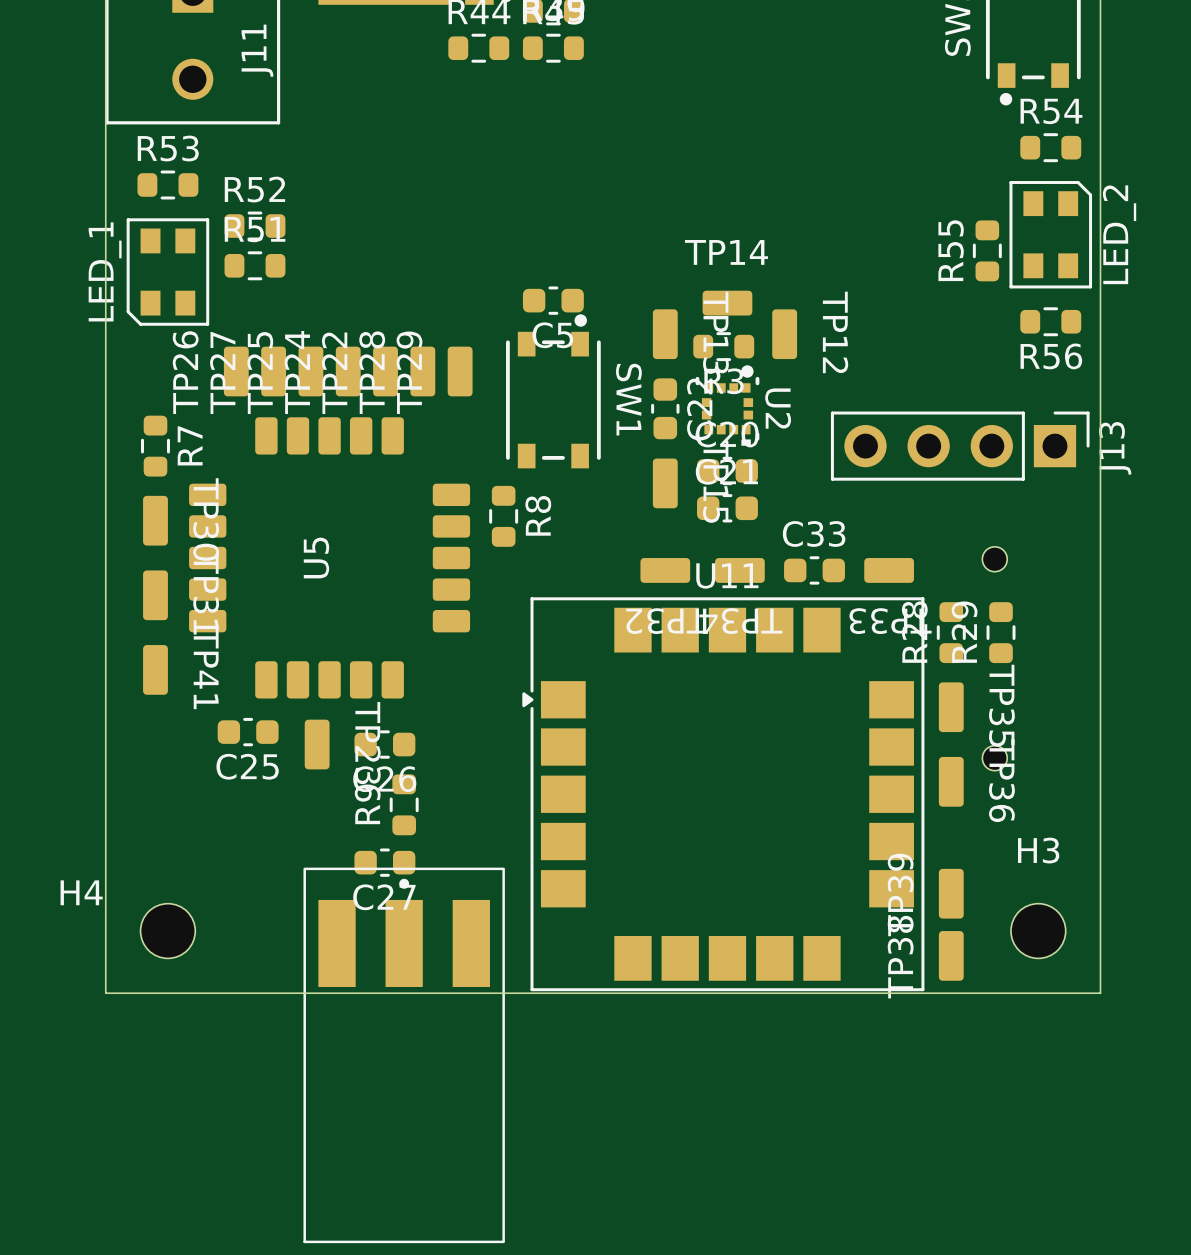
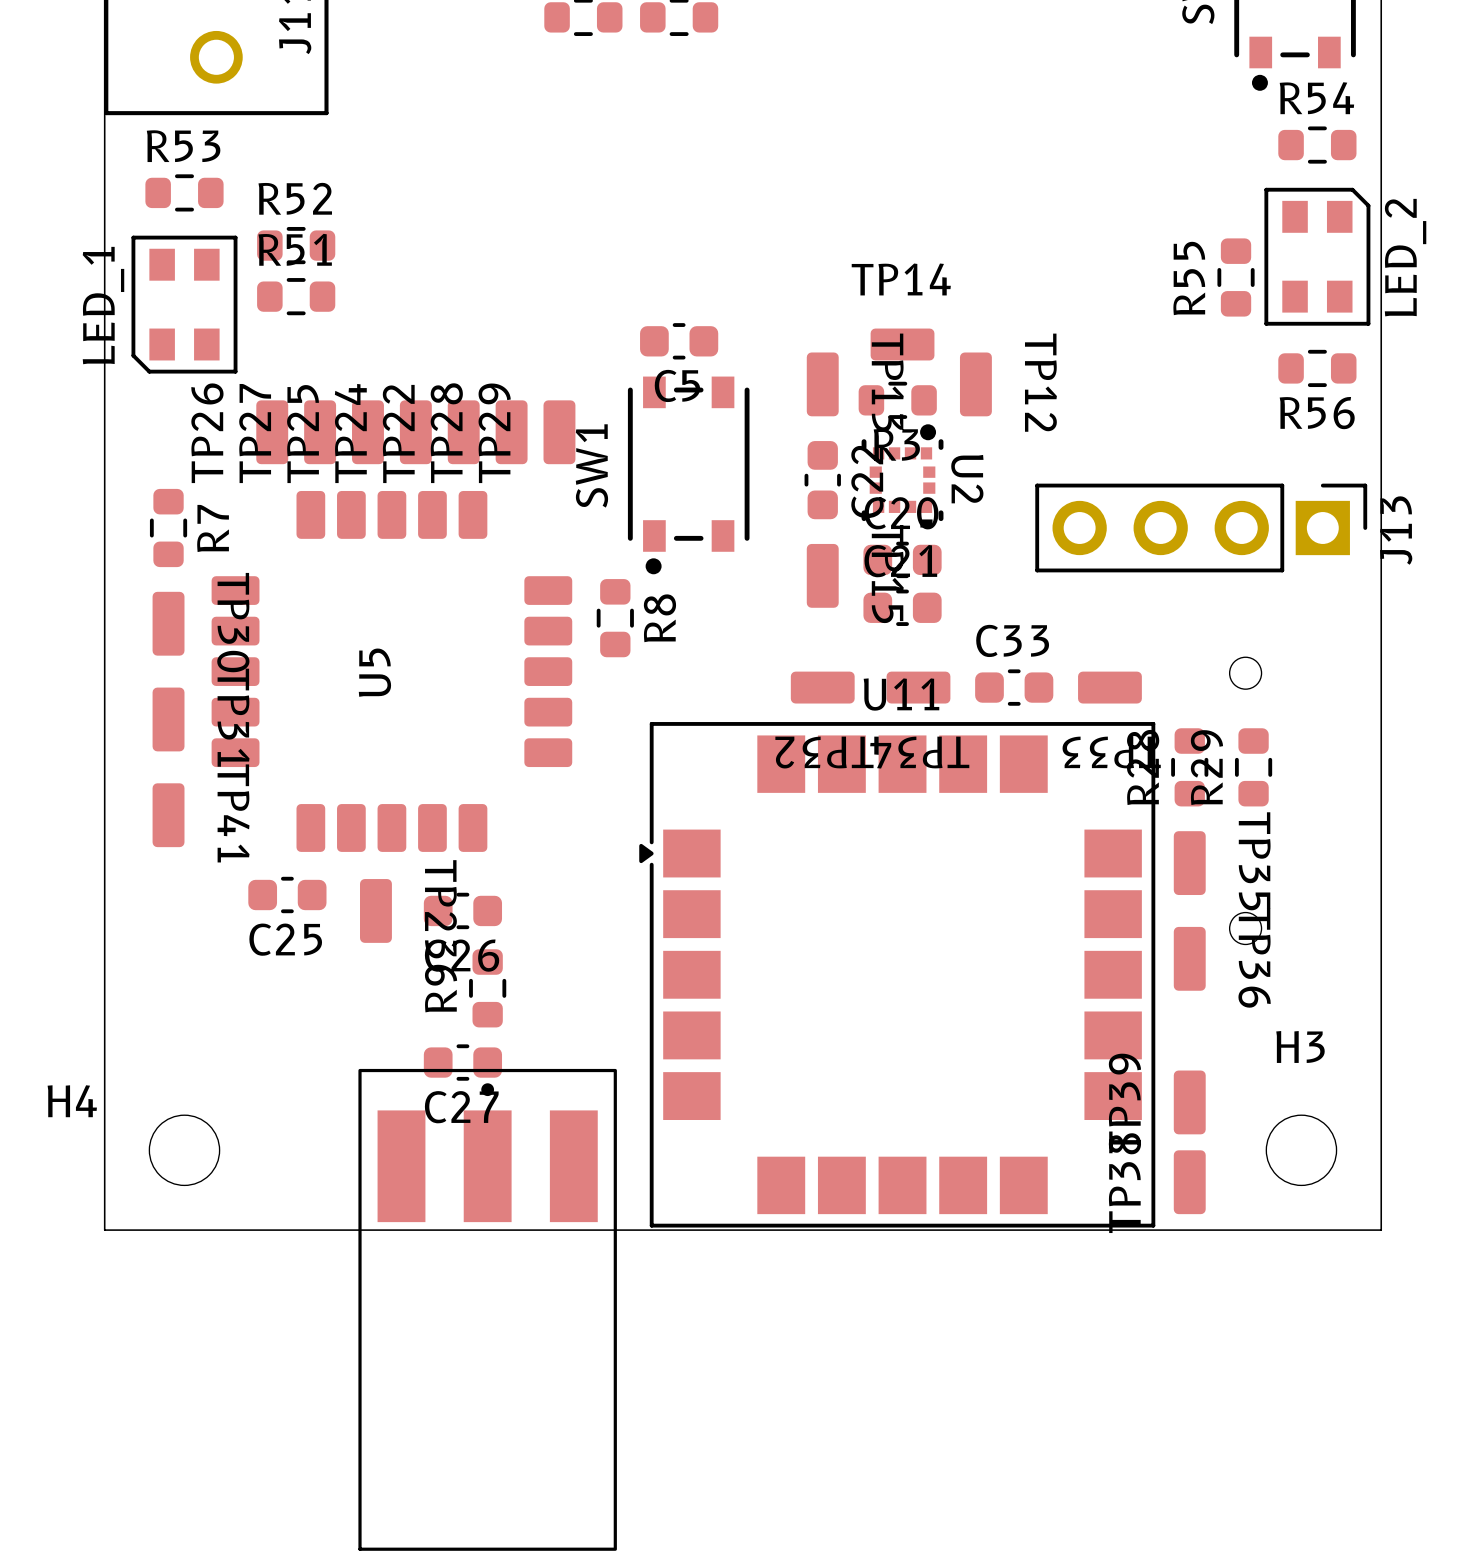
SW1 rotation: 0° (553, 391) -> 180° (688, 475)

